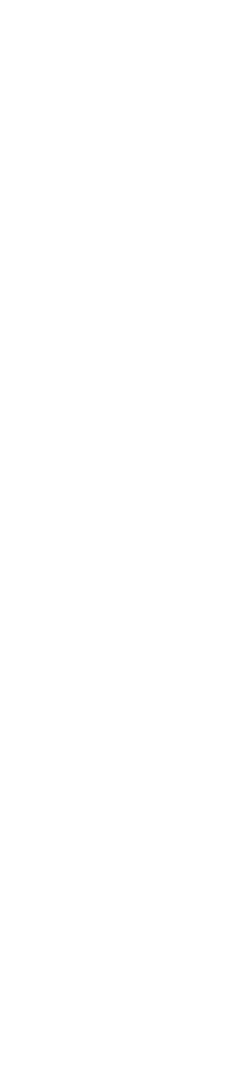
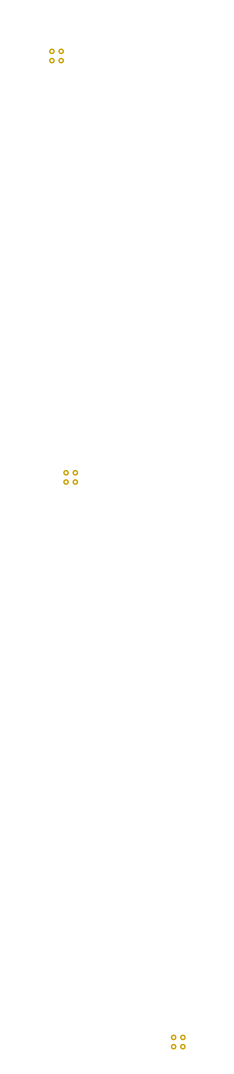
part: none -> (56, 55)
part: none -> (70, 477)
part: none -> (178, 1042)

